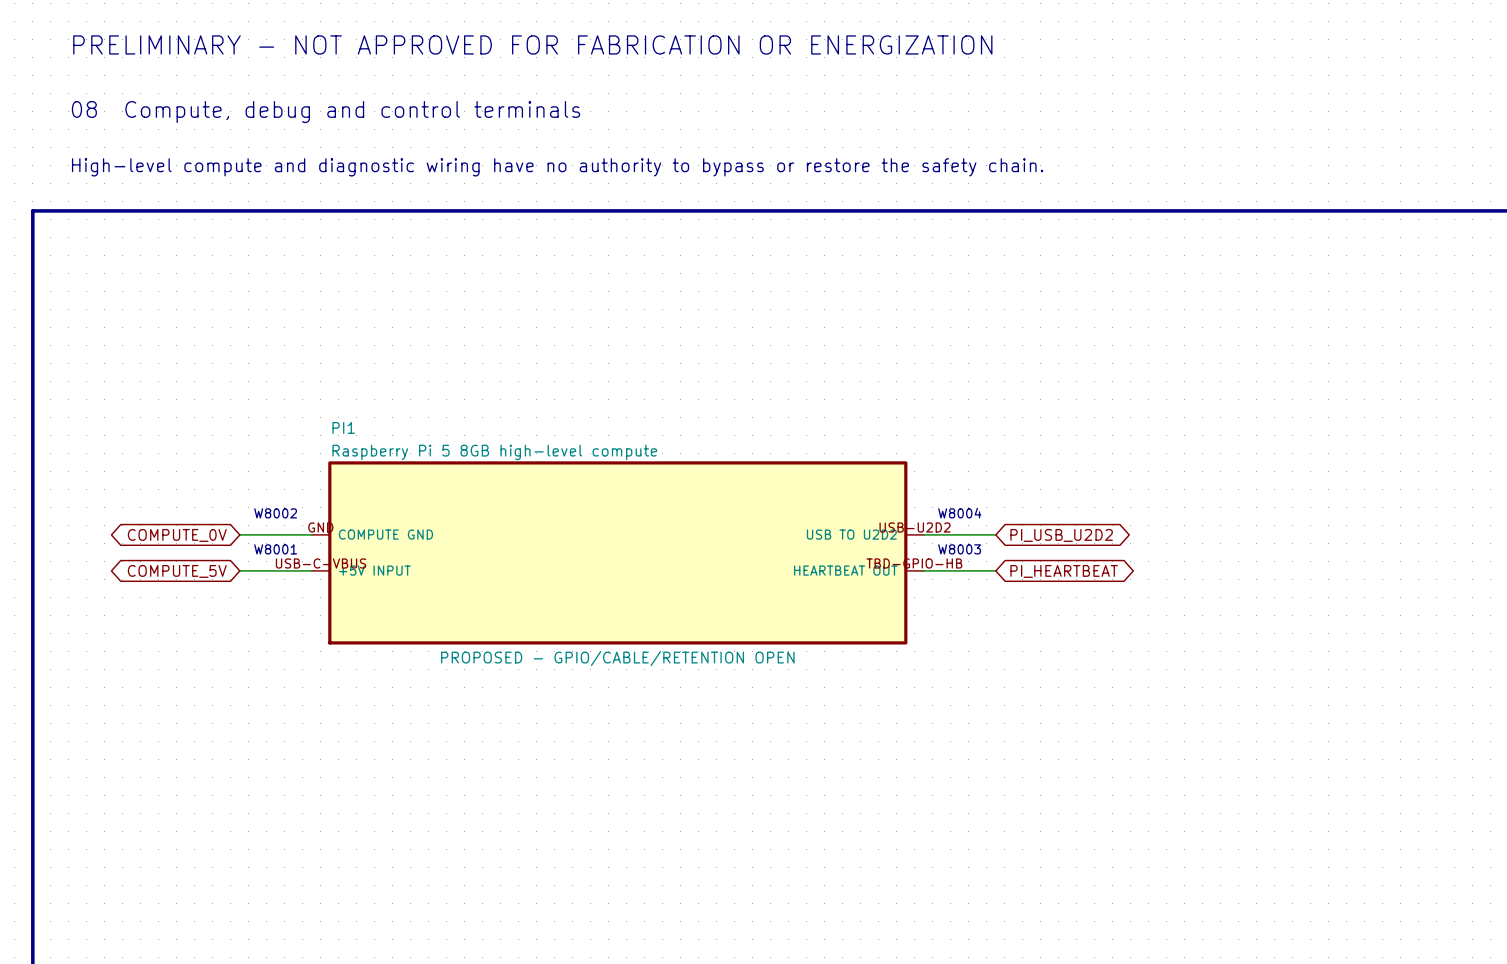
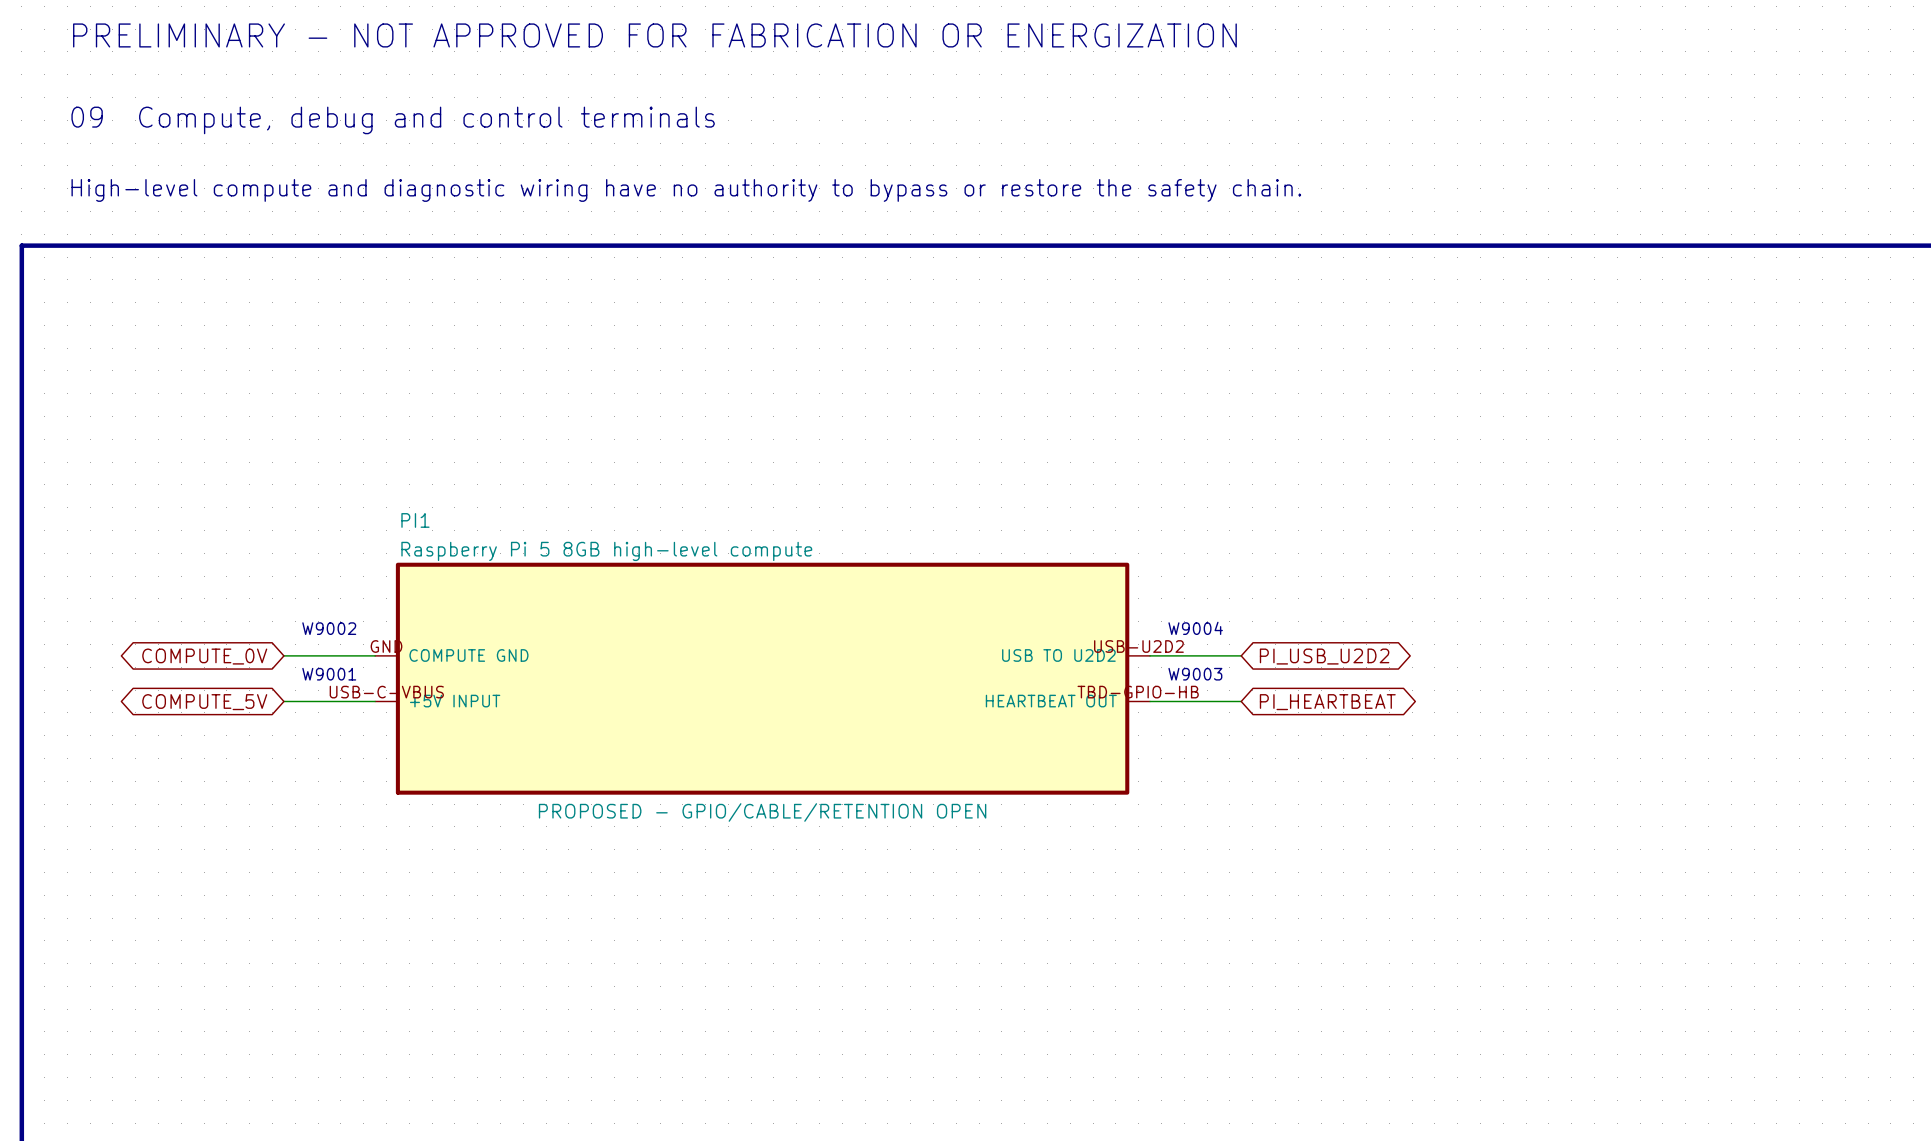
text: 08 Compute, debug and control terminals (326, 112) -> 09 Compute, debug and control terminals (393, 120)
text: W8002 (275, 513) -> W9002 (329, 628)
text: W8004 (959, 513) -> W9004 (1195, 628)
text: W8001 (275, 549) -> W9001 (329, 674)
text: W8003 (959, 549) -> W9003 (1195, 674)

